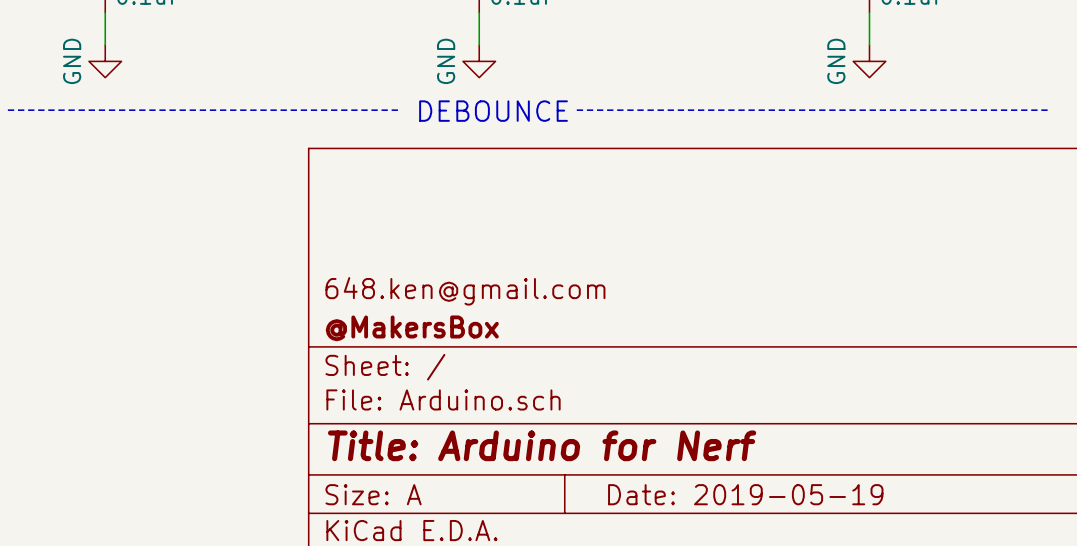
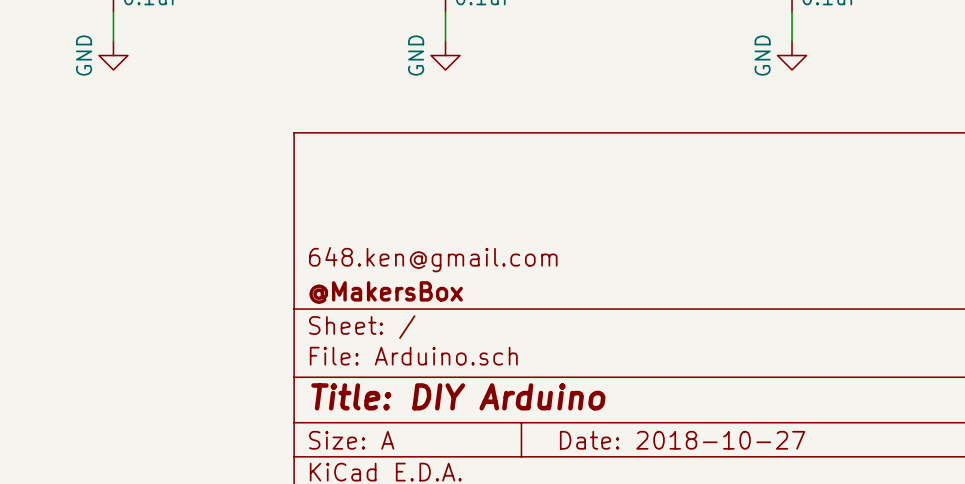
line: (7, 110) (397, 110) -> none
line: (576, 110) (1048, 110) -> none
text: DEBOUNCE (493, 111) -> none
title block: Title: Arduino for Nerf (542, 445) -> Title: DIY Arduino (458, 396)
title block: Date: 2019-05-19 (745, 494) -> Date: 2018-10-27 (682, 440)

